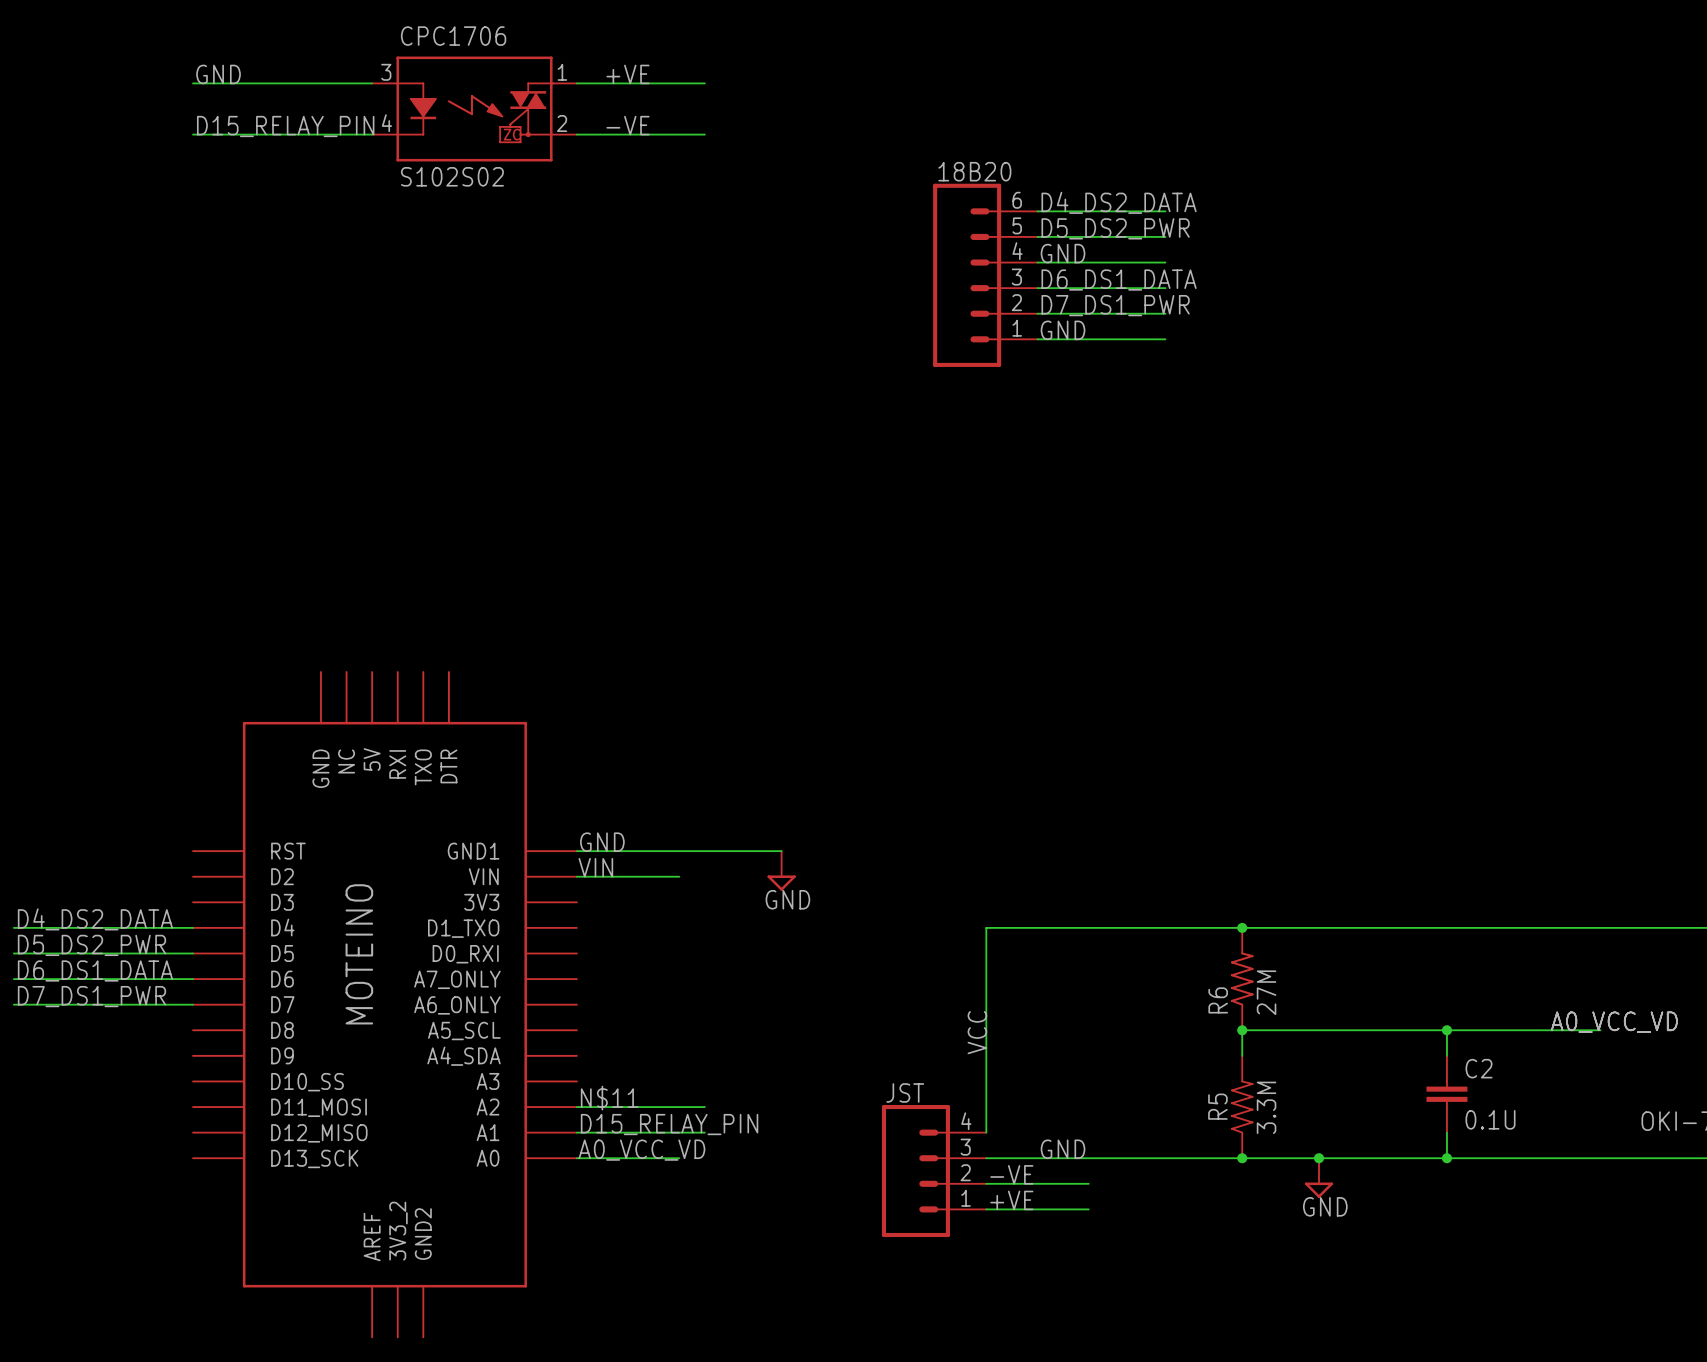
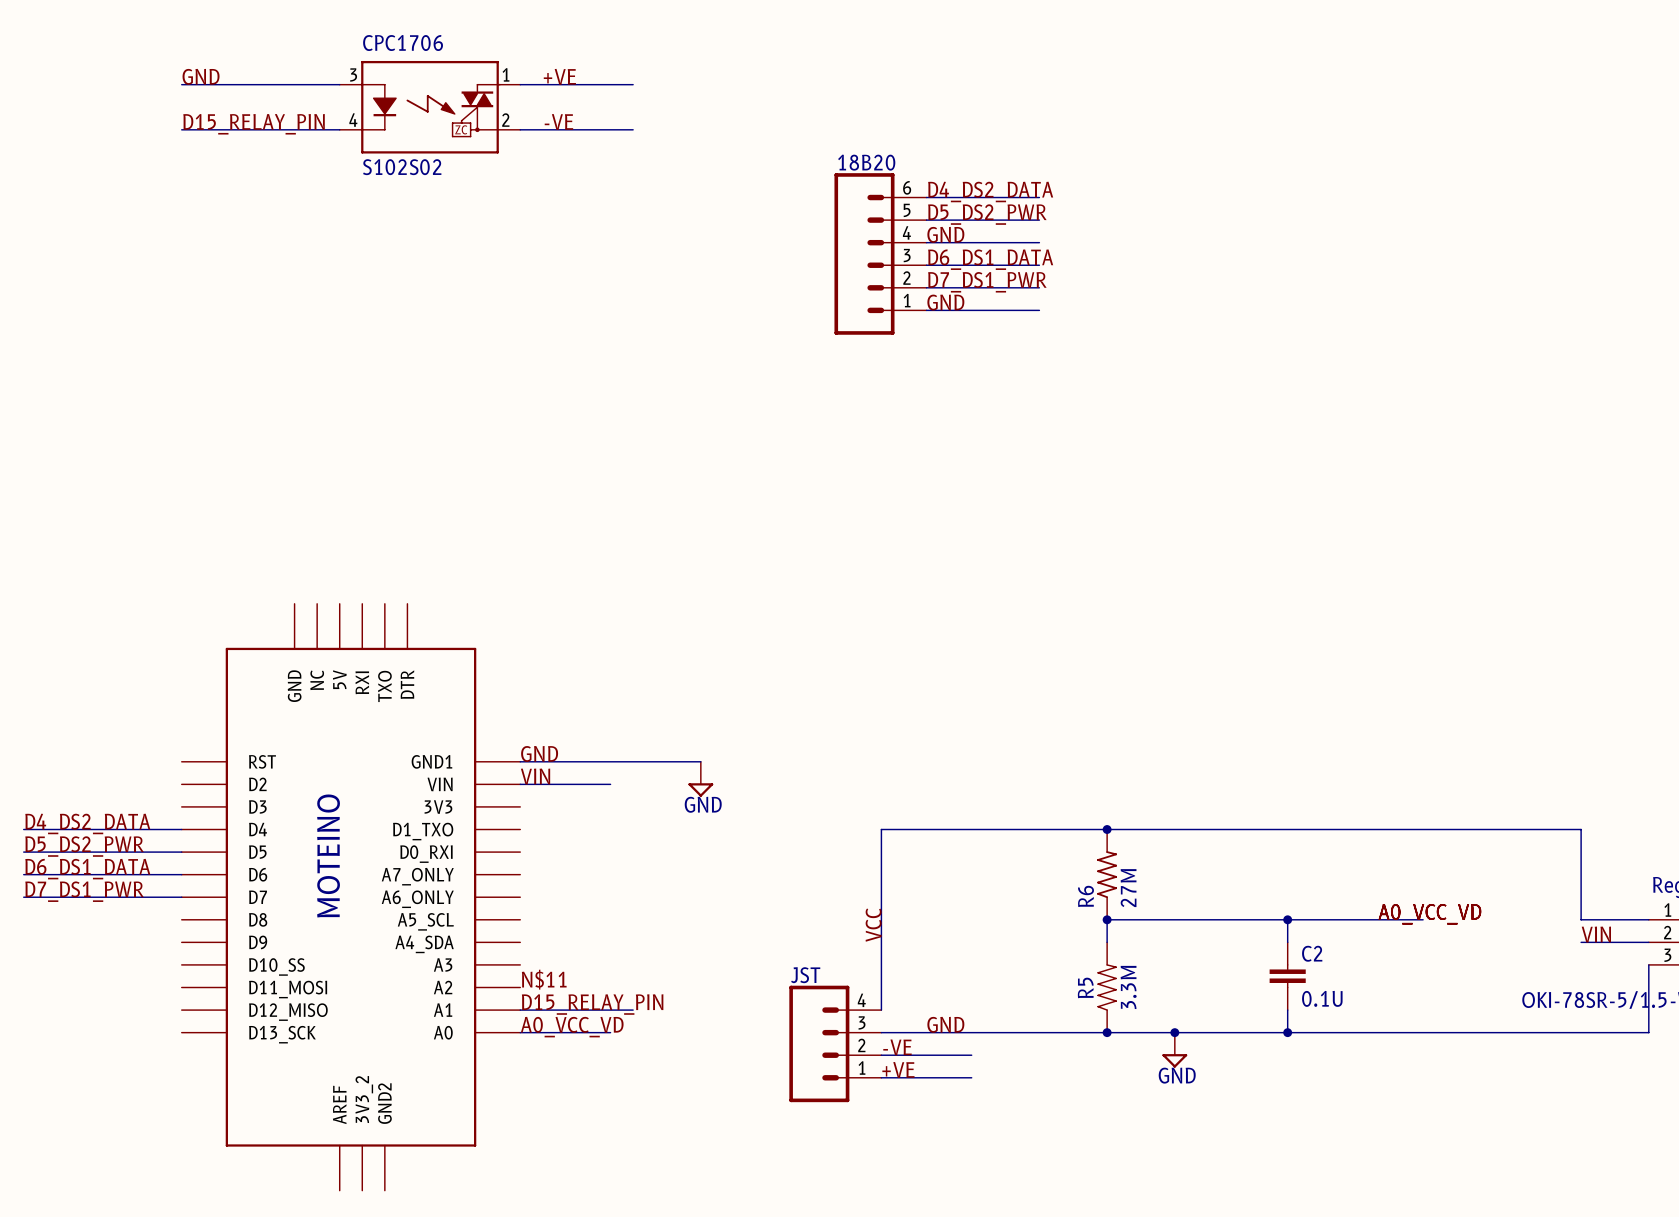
wire: (576, 1107) (704, 1107) -> none

